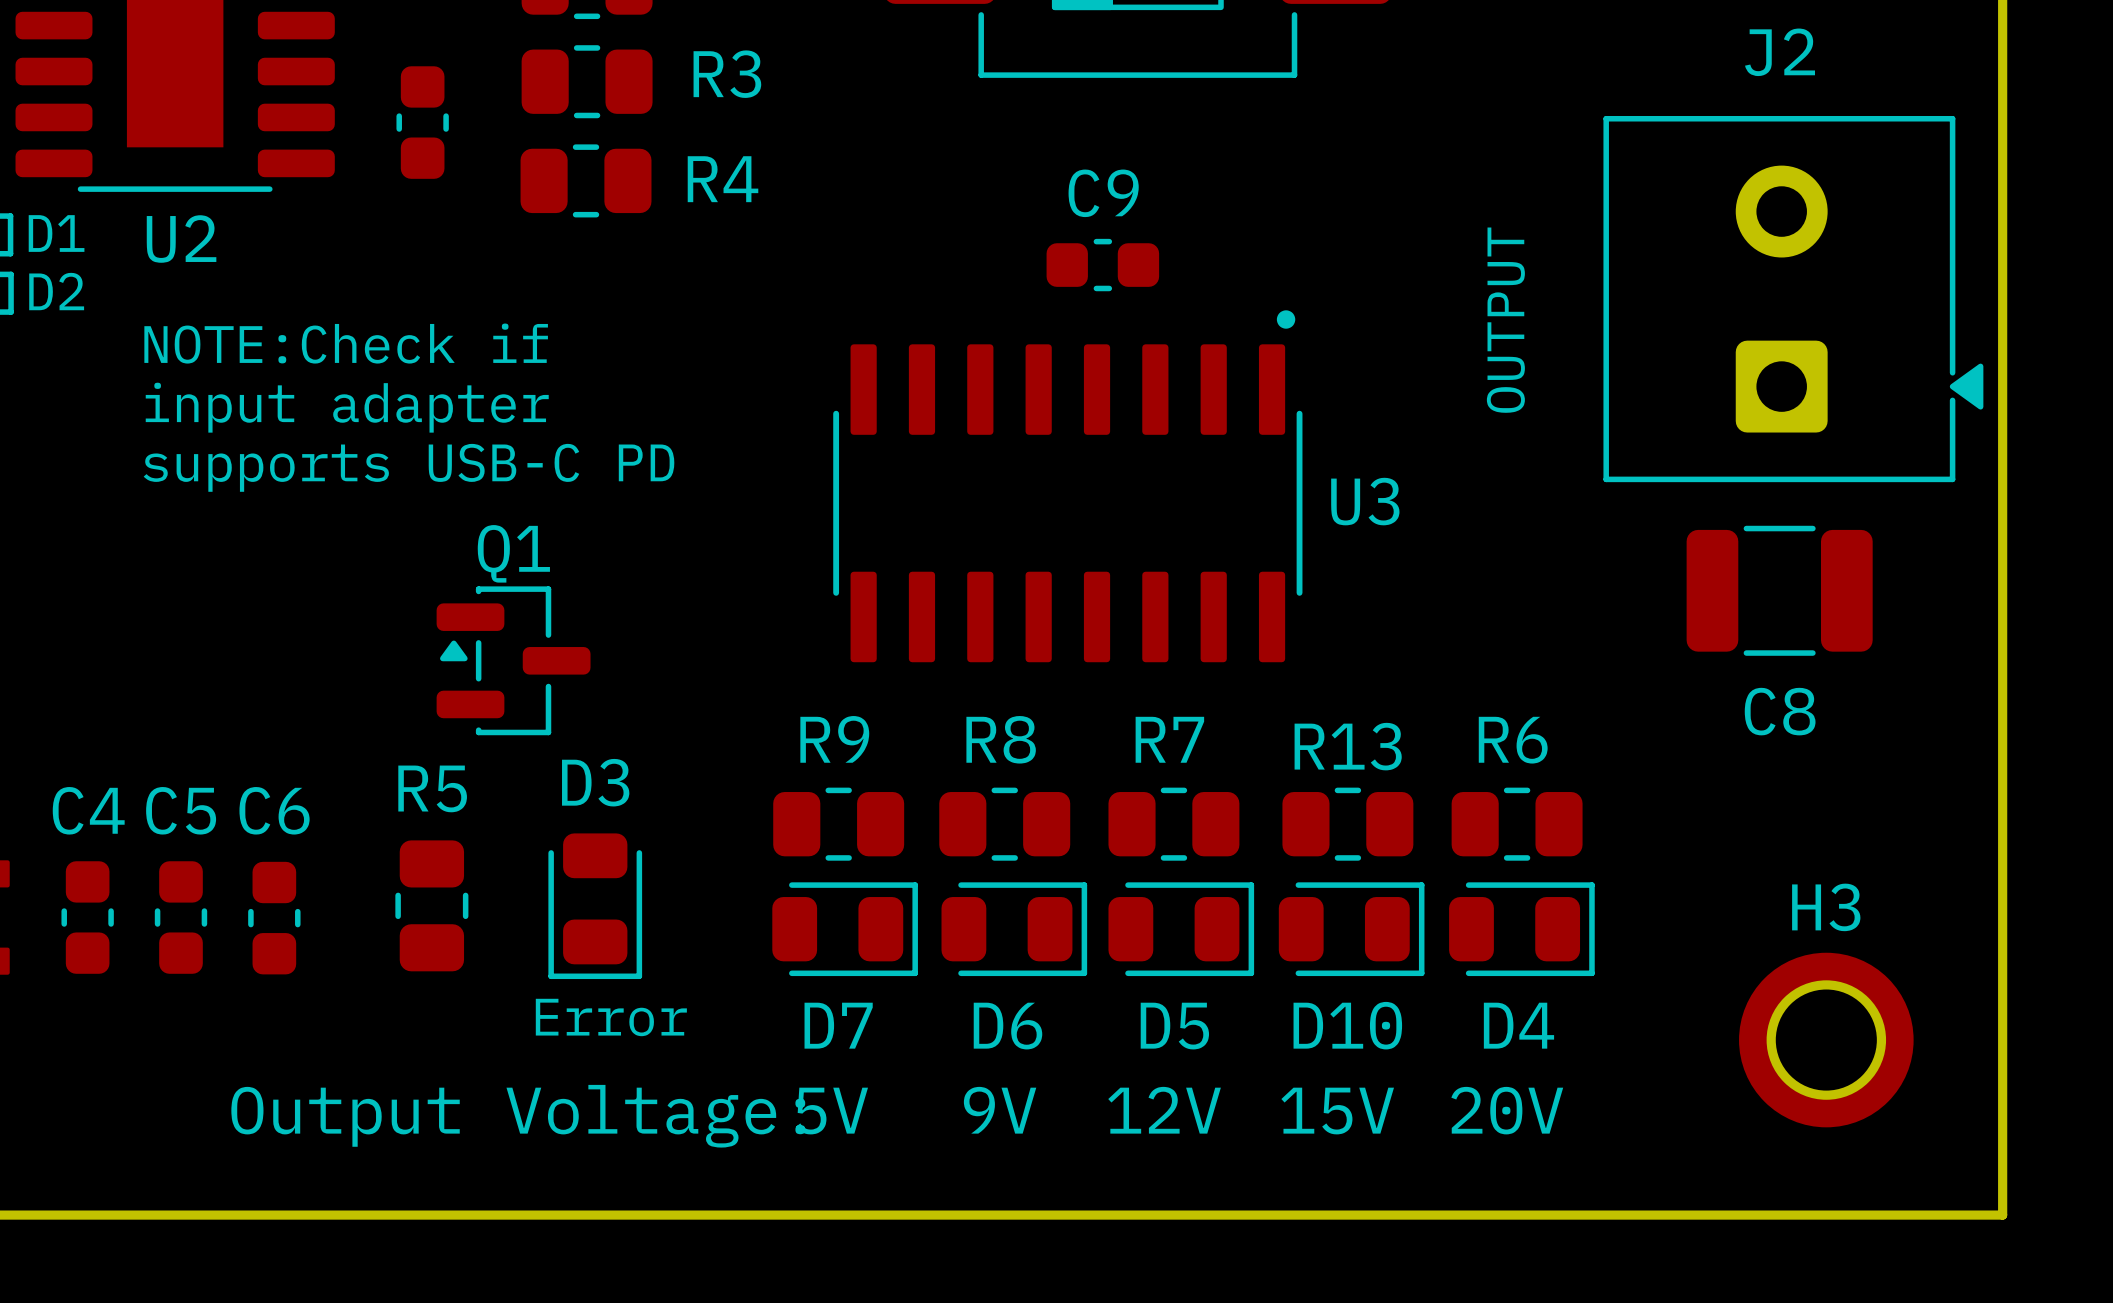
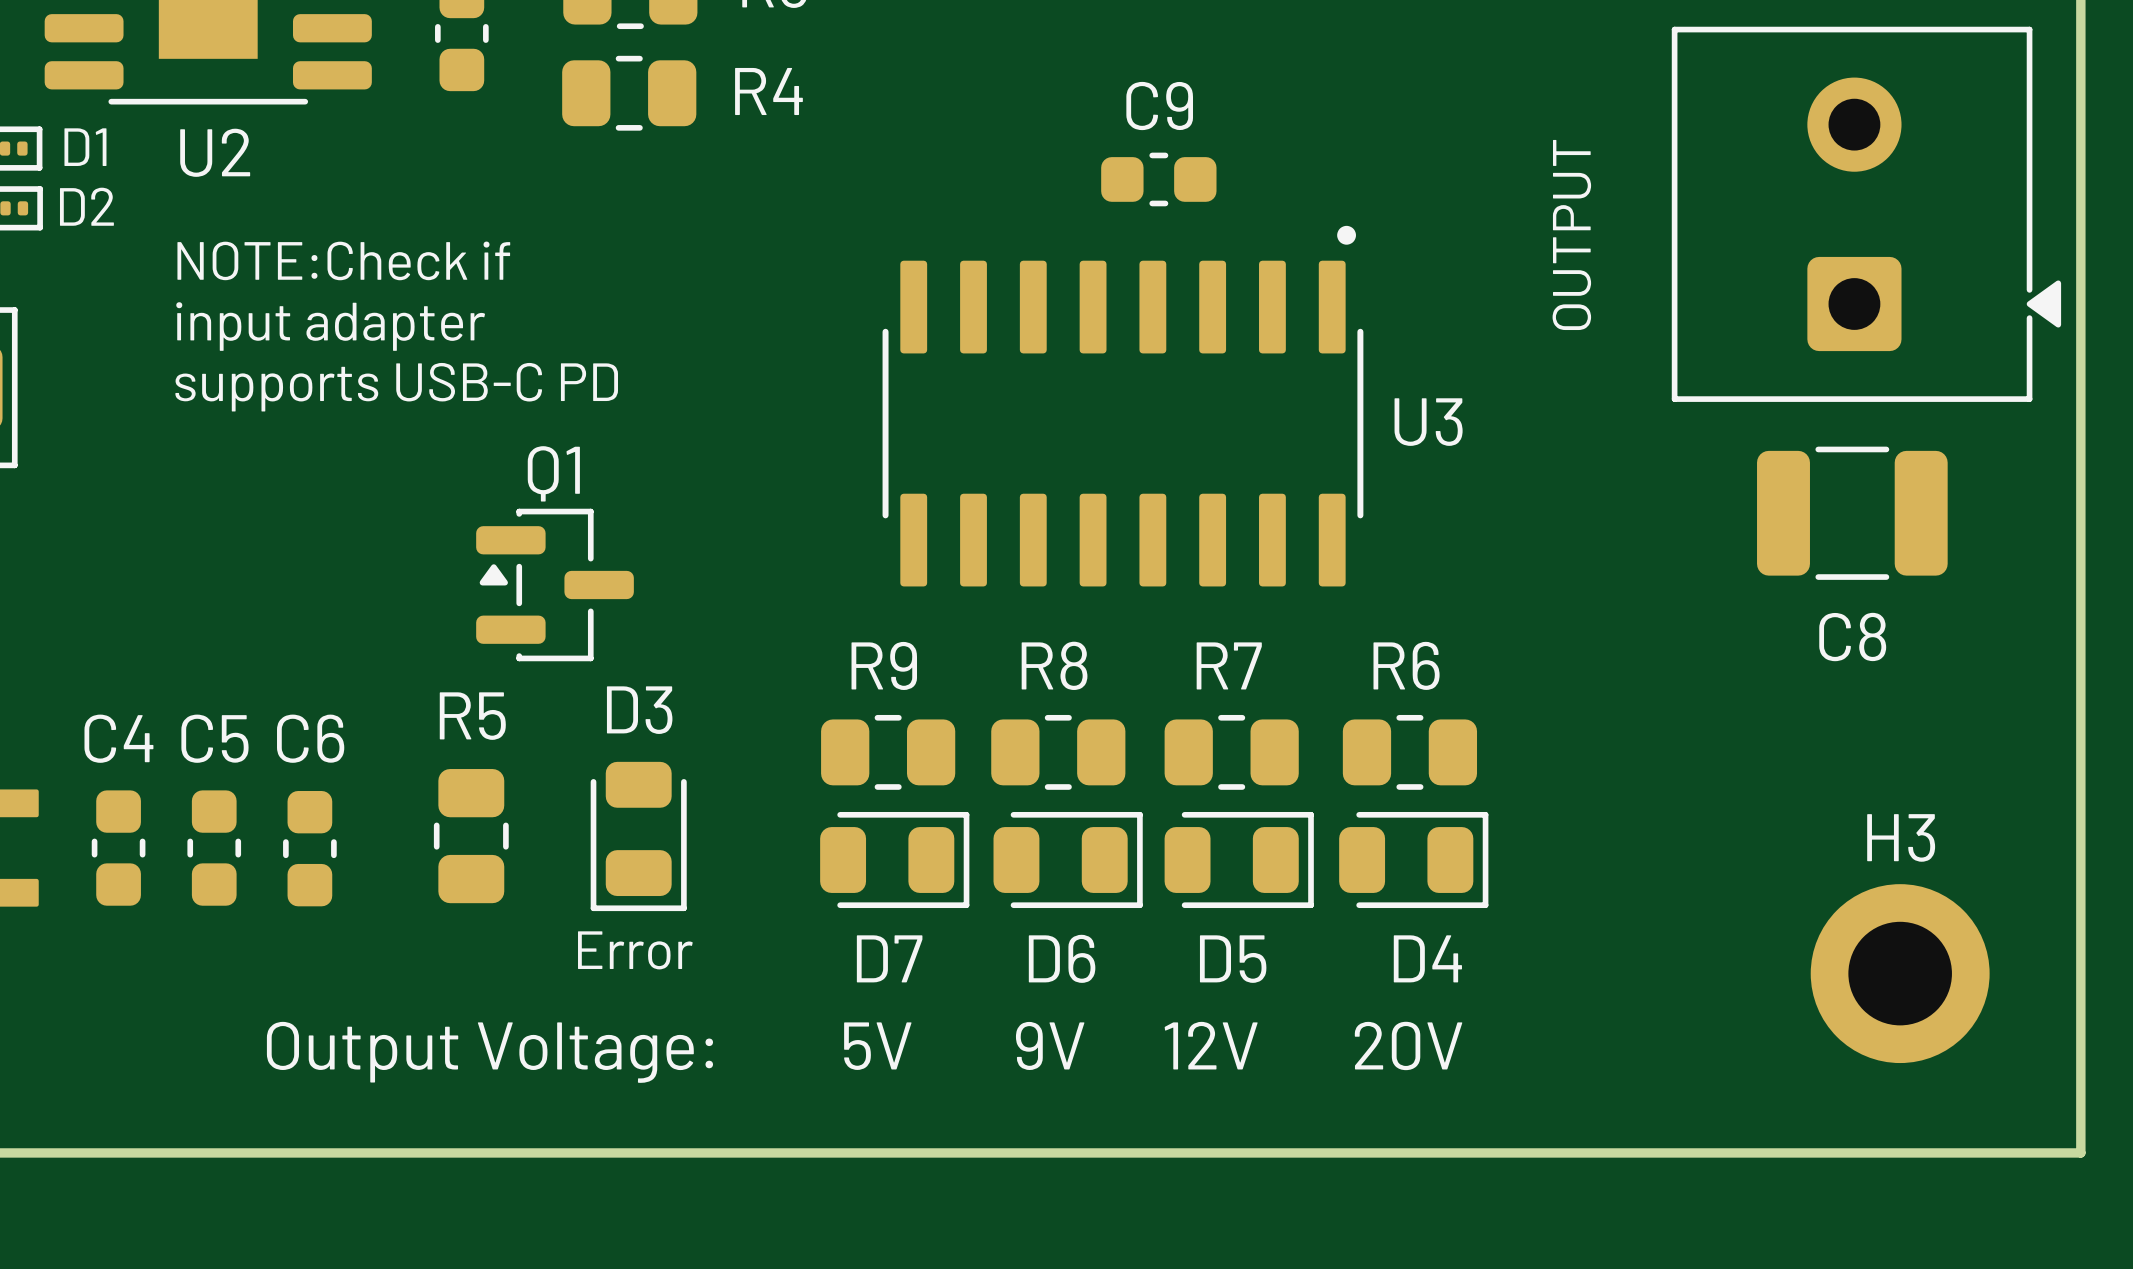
R13 name: R13 (1348, 746) -> R6 (1406, 665)
R6: (1517, 824) -> none
D4: (1521, 929) -> none
D10 name: D10 (1347, 1025) -> D4 (1427, 958)
text: 20V (1507, 1110) -> none
text: 15V (1337, 1111) -> 20V (1408, 1045)

